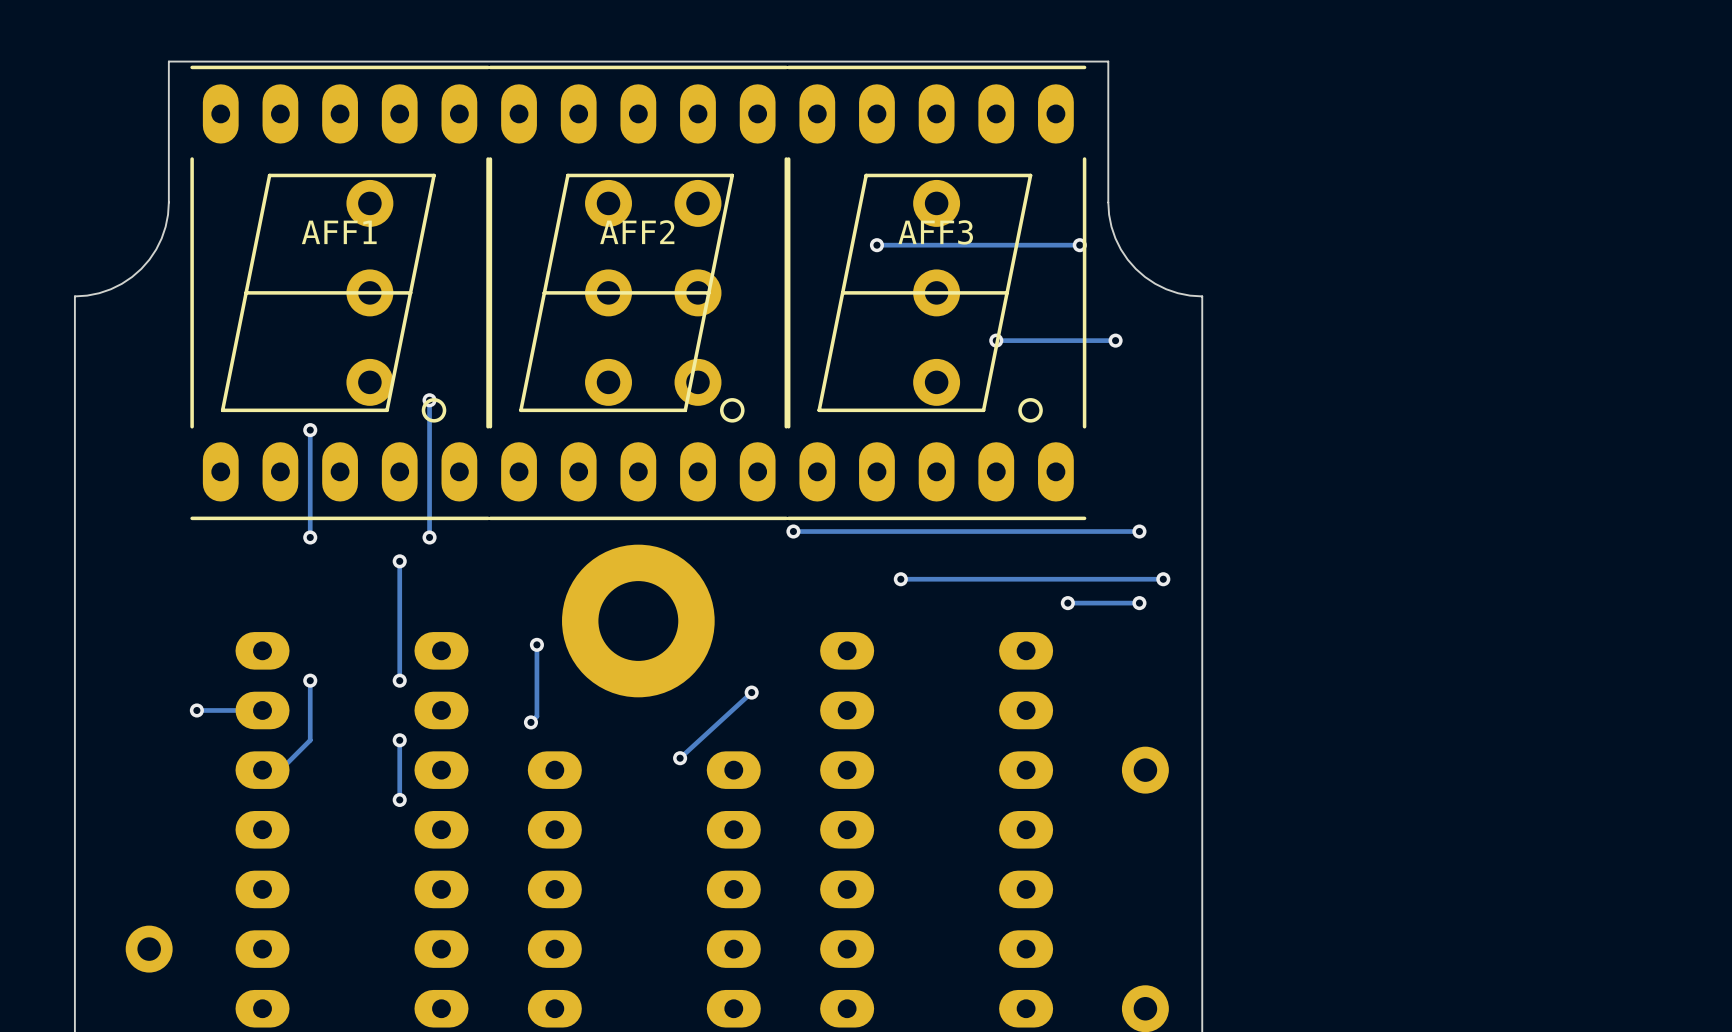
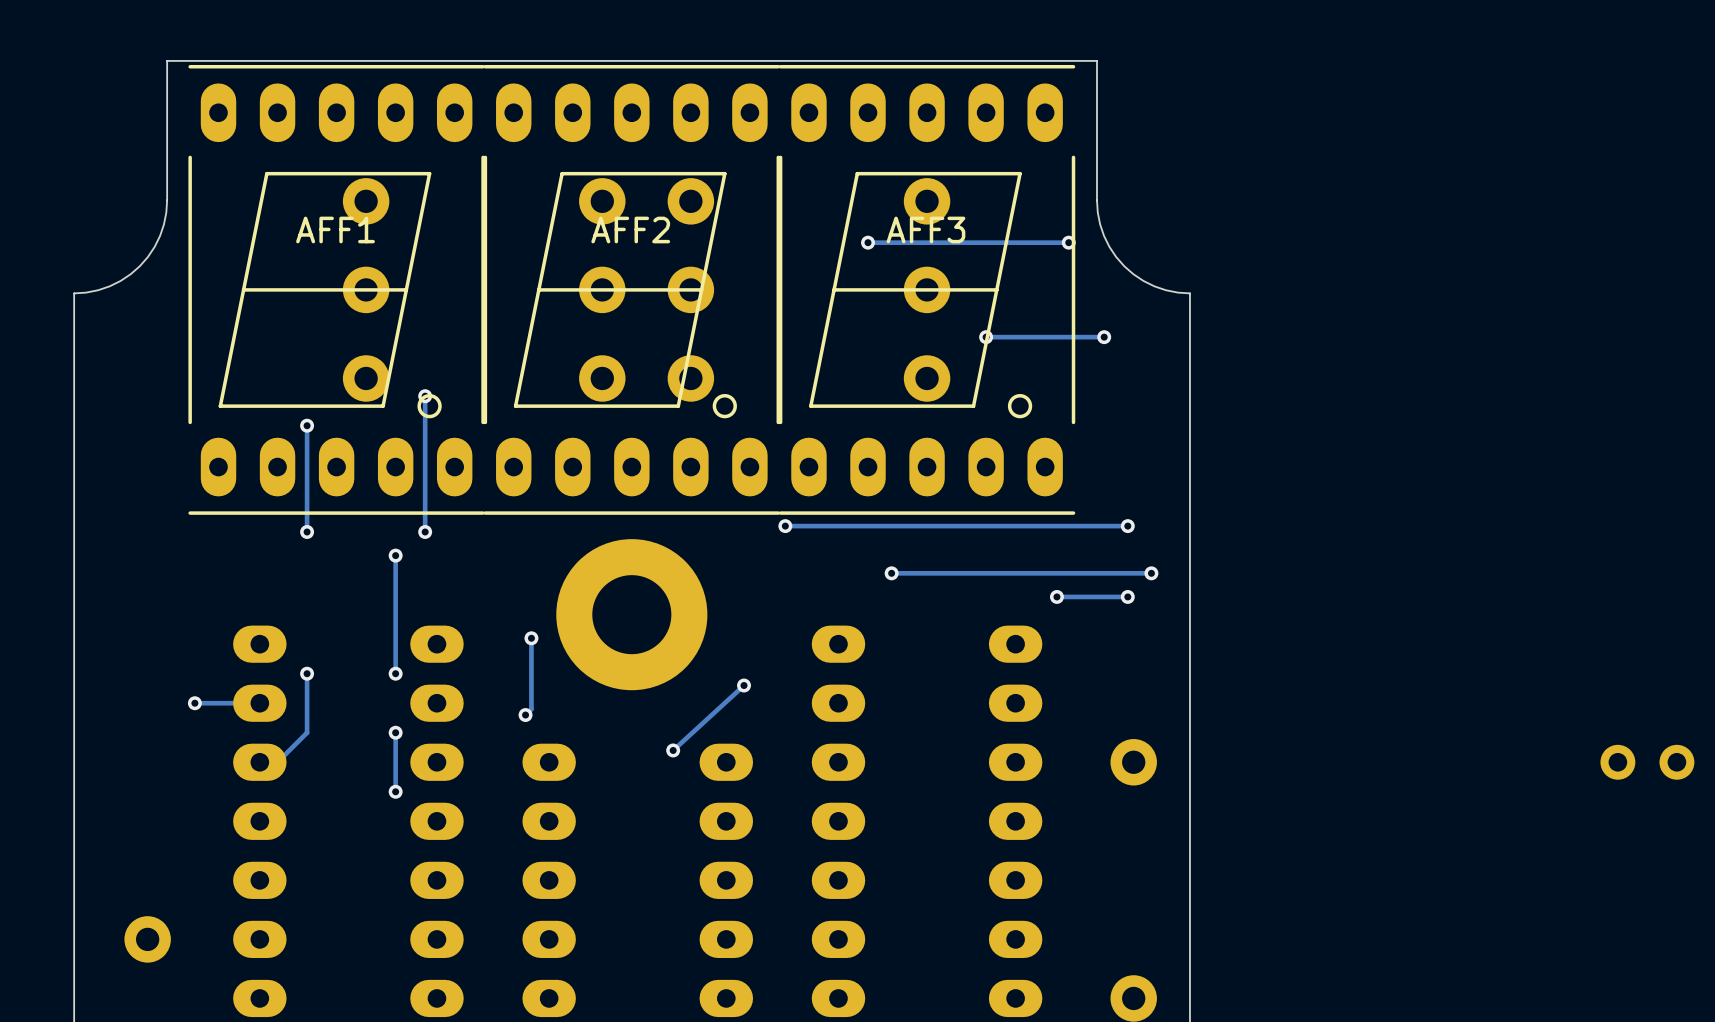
part: none -> (1647, 762)

